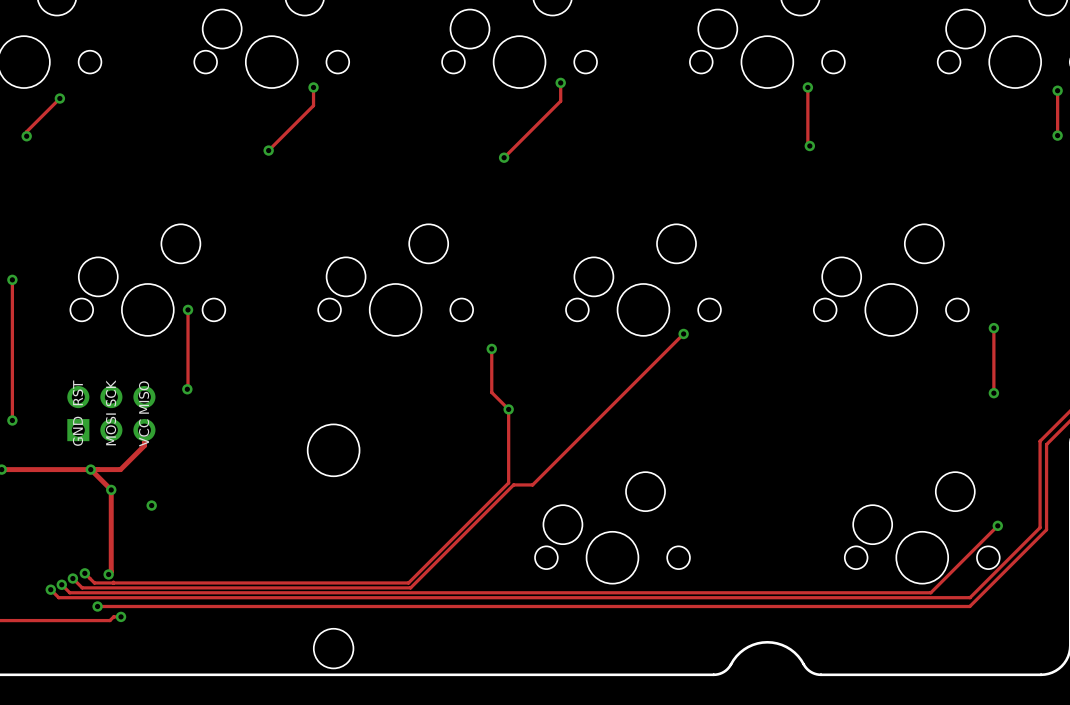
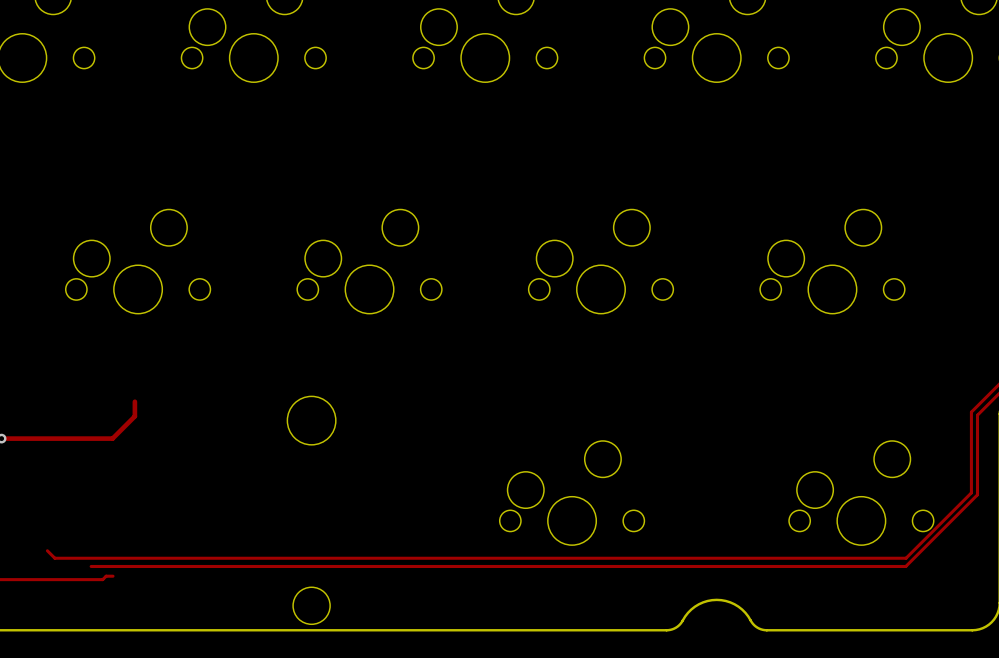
track: (560, 82) (560, 101) (504, 157) -> none
via: (560, 82) -> none
track: (313, 87) (313, 105) (268, 150) -> none
via: (313, 87) -> none
track: (807, 87) (807, 144) (809, 146) -> none
via: (807, 87) -> none
track: (1057, 90) (1057, 135) -> none
via: (1057, 90) -> none
track: (59, 98) (26, 131) (26, 136) -> none
via: (59, 98) -> none
via: (1057, 135) -> none
via: (26, 136) -> none
via: (809, 146) -> none
via: (268, 150) -> none
via: (504, 157) -> none
track: (12, 279) (12, 420) -> none
via: (12, 279) -> none
track: (188, 309) (187, 389) -> none
via: (188, 309) -> none
track: (993, 328) (993, 393) -> none
via: (993, 328) -> none
track: (683, 333) (532, 484) (513, 484) (410, 587) (82, 587) (72, 578) -> none
via: (683, 333) -> none
track: (491, 348) (491, 392) (508, 409) (508, 482) (408, 582) (94, 582) (84, 573) -> none
via: (491, 348) -> none
via: (187, 389) -> none
via: (993, 393) -> none
via: (508, 409) -> none
part: (111, 413) -> none
via: (12, 420) -> none
track: (90, 469) (111, 489) (111, 571) (108, 574) -> none
via: (90, 469) -> none
via: (111, 489) -> none
via: (151, 505) -> none
track: (997, 525) (930, 592) (69, 592) (61, 584) -> none
via: (997, 525) -> none
via: (84, 573) -> none
via: (108, 574) -> none
via: (72, 578) -> none
track: (113, 582) (113, 582) -> none
via: (61, 584) -> none
via: (50, 589) -> none
via: (97, 606) -> none
via: (121, 616) -> none

